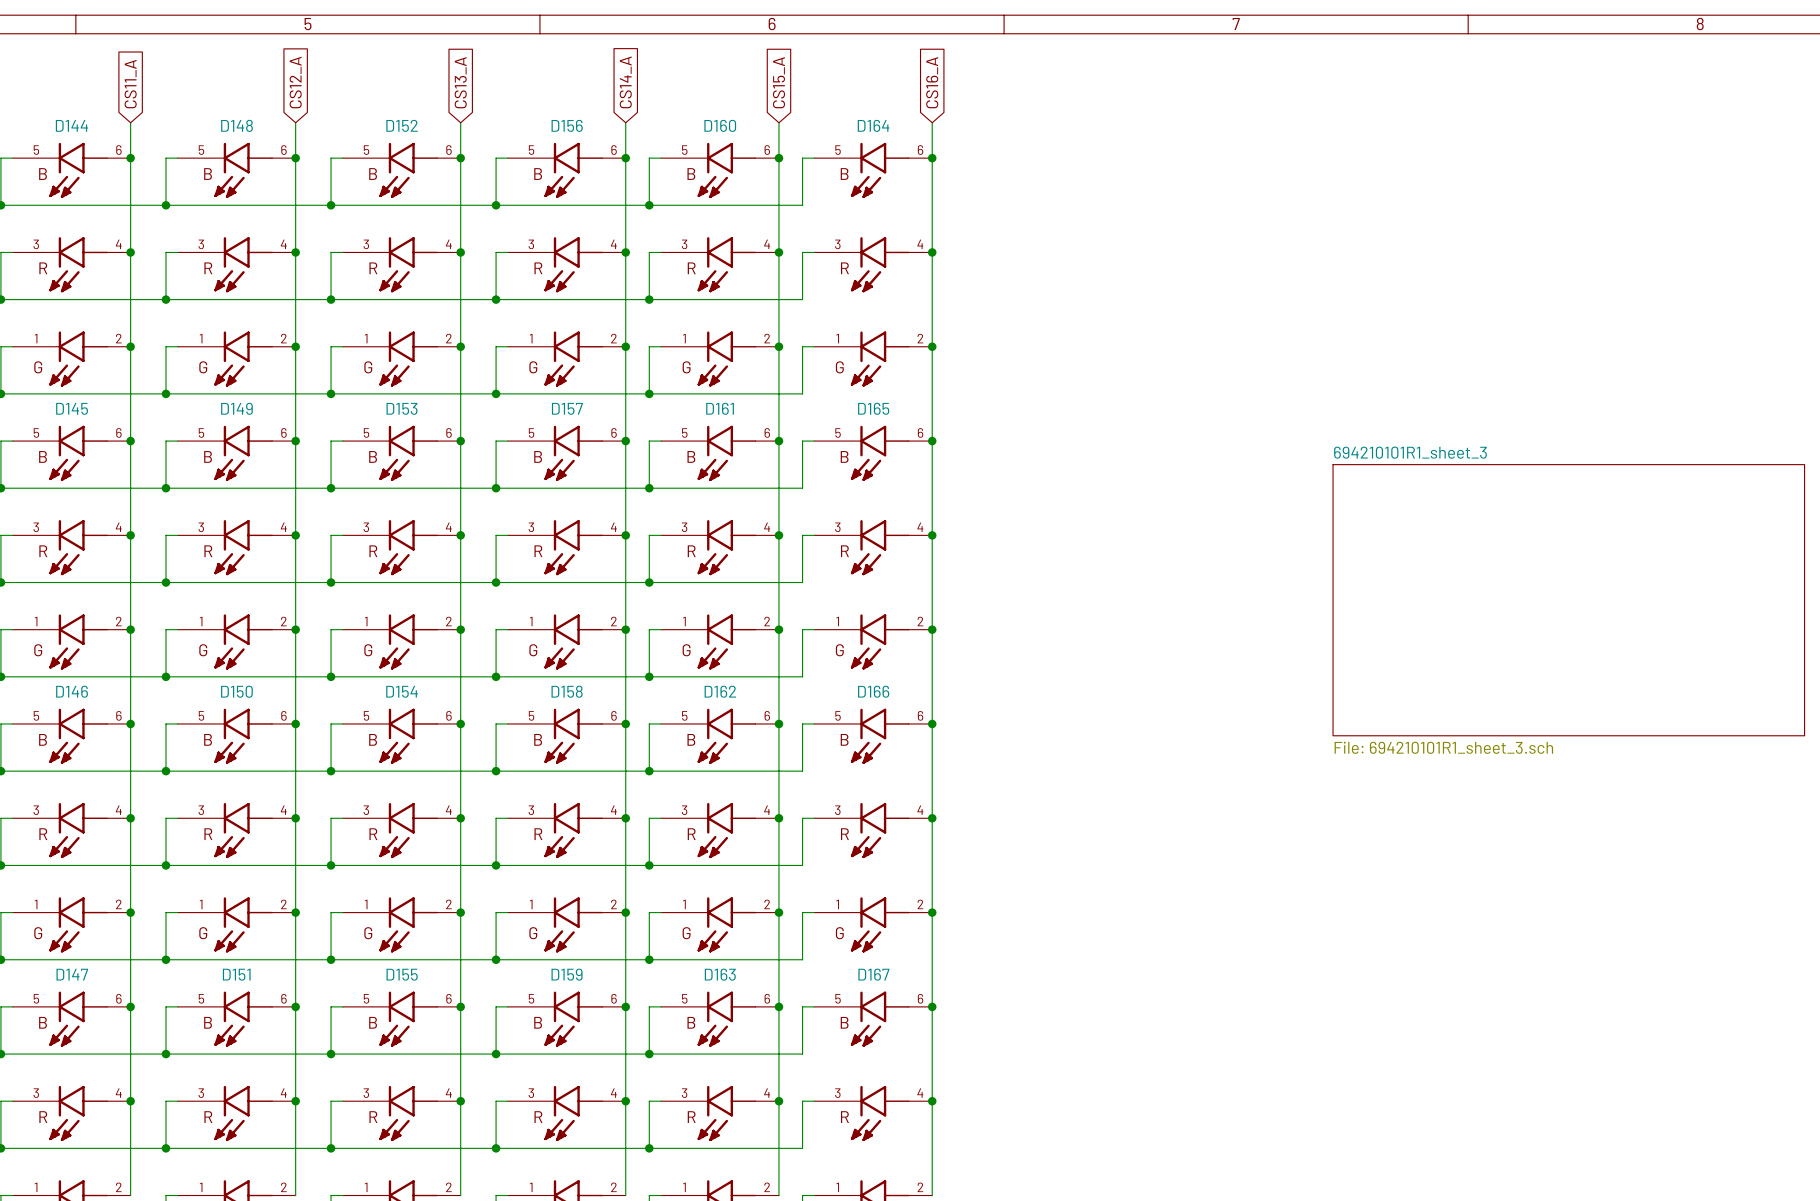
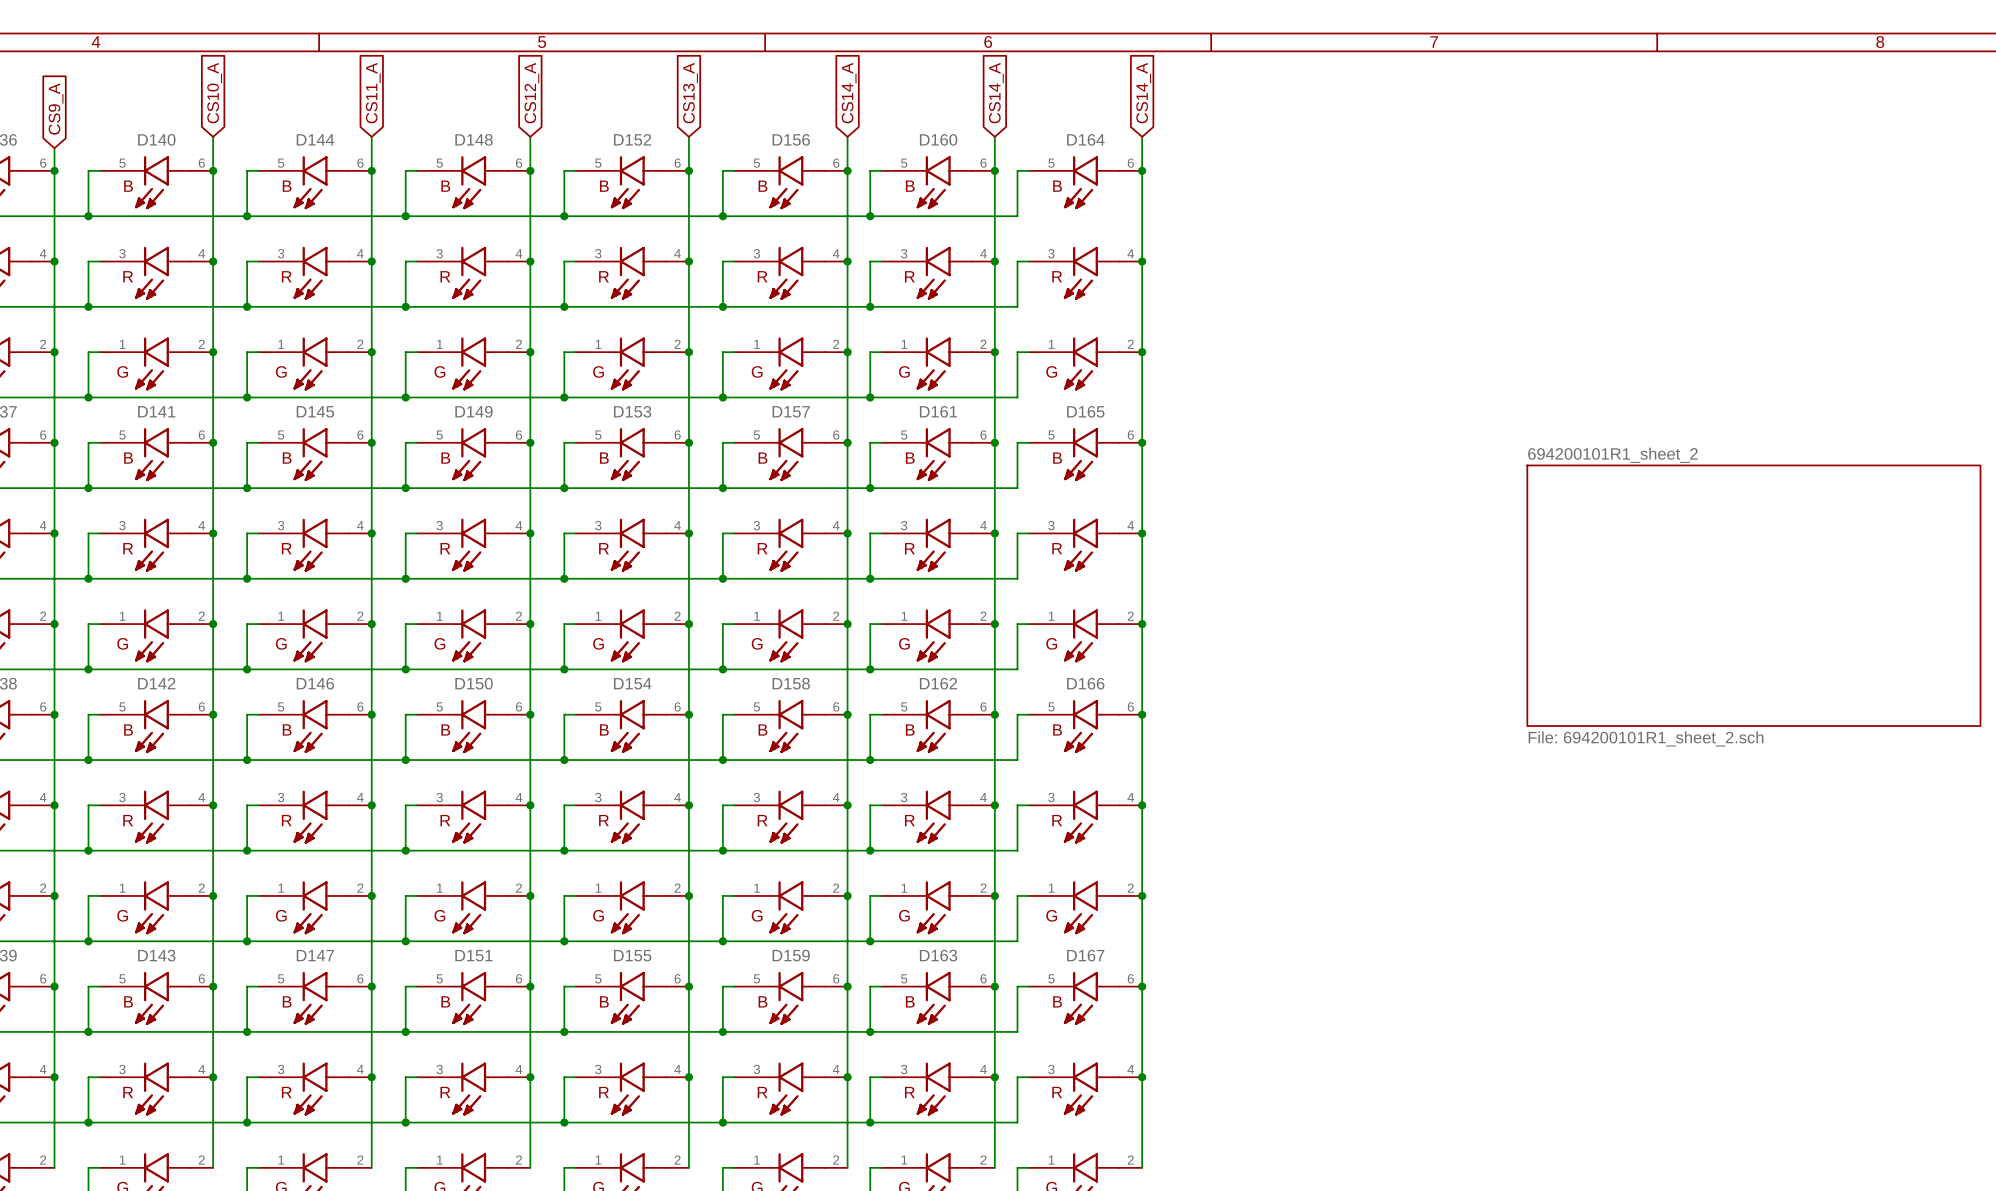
global label: CS15_A (778, 82) -> CS14_A (996, 93)
global label: CS16_A (932, 82) -> CS14_A (1143, 93)
sheet 694210101R1_sheet_3 name: 694210101R1_sheet_3 (1410, 452) -> 694200101R1_sheet_2 (1612, 455)
sheet 694210101R1_sheet_3 value: File: 694210101R1_sheet_3.sch (1443, 747) -> File: 694200101R1_sheet_2.sch (1646, 738)

